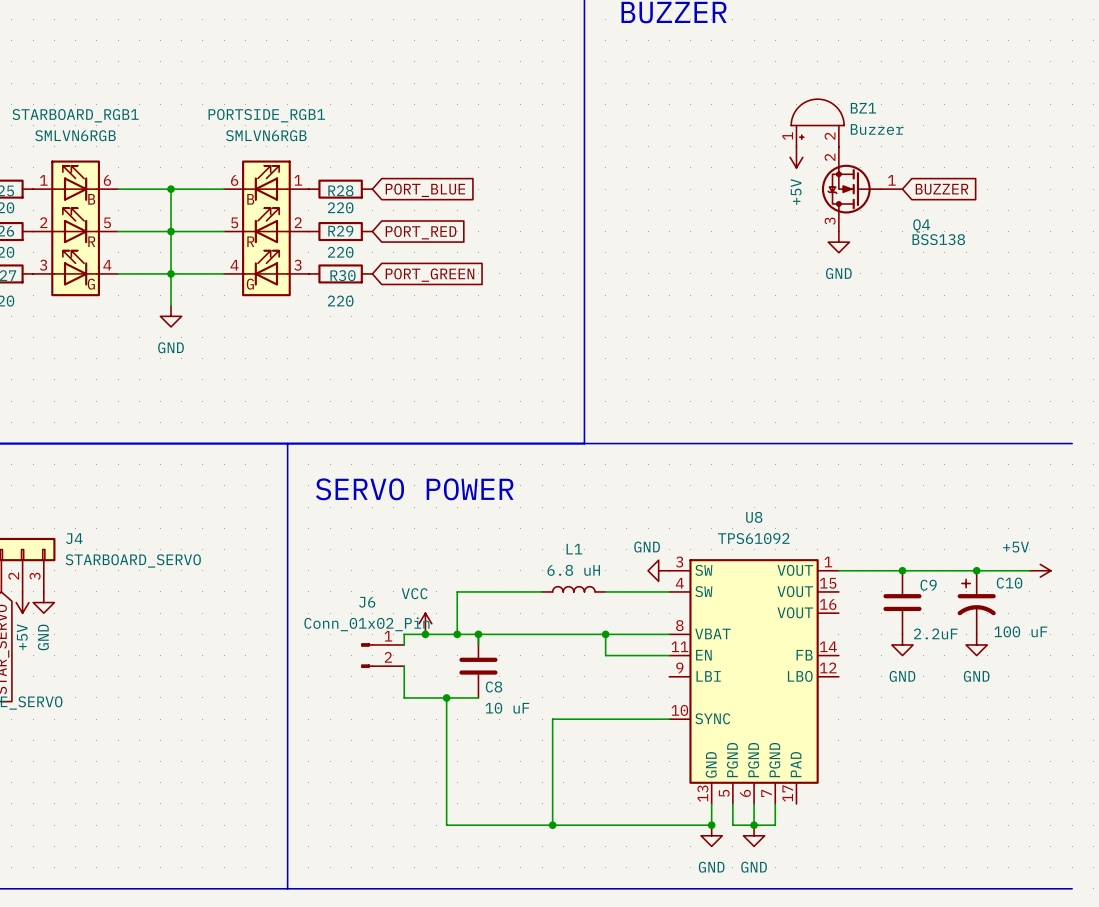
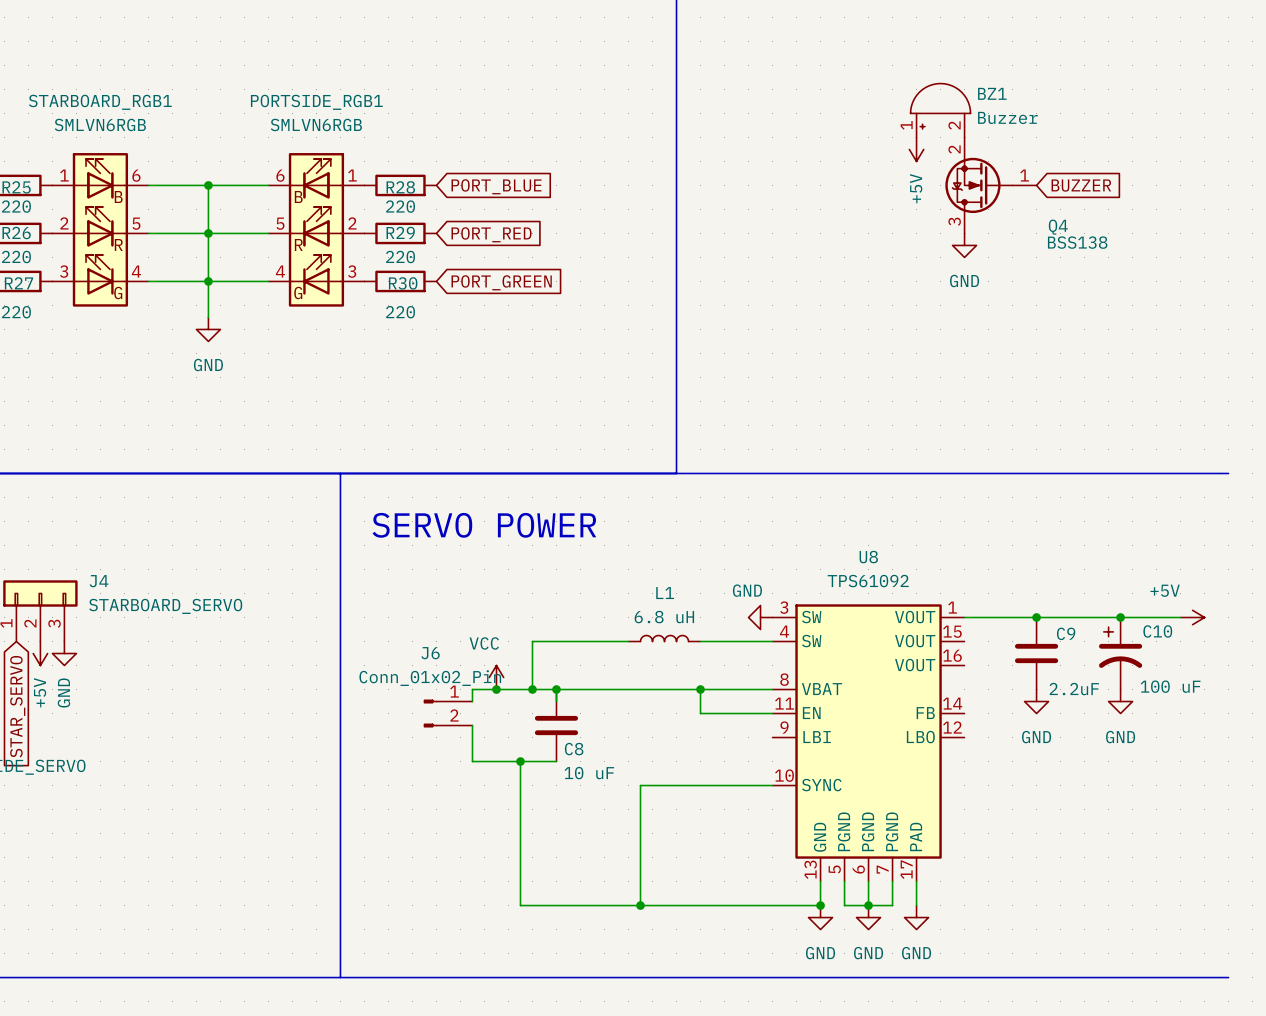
wire: none -> (916, 881) (916, 905)
power symbol: none -> GND (916, 917)

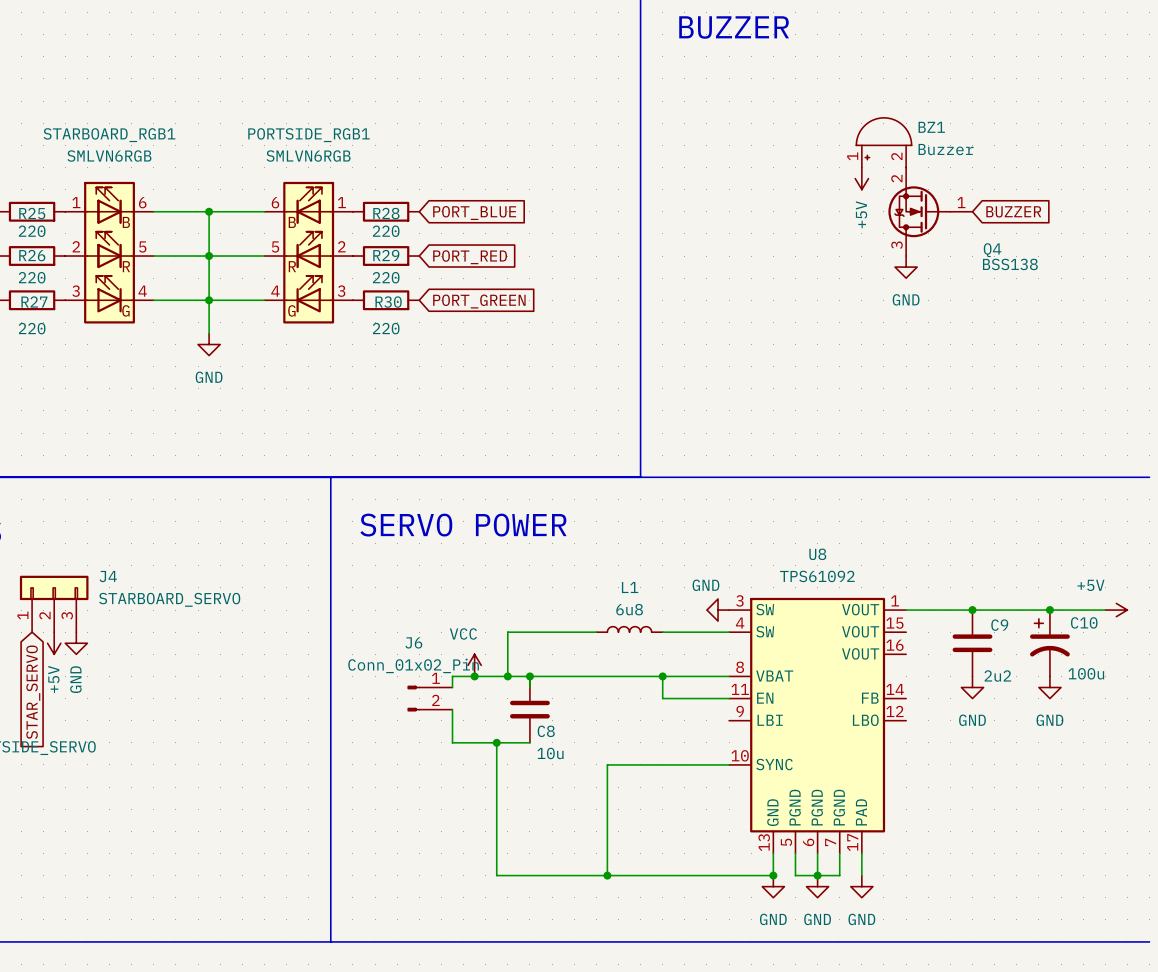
L1 value: 6.8 uH (664, 617) -> 6u8 (629, 609)
C10 value: 100 uF (1170, 686) -> 100u (1086, 673)
C9 value: 2.2uF (1074, 689) -> 2u2 (997, 676)
C8 value: 10 uF (589, 773) -> 10u (550, 753)

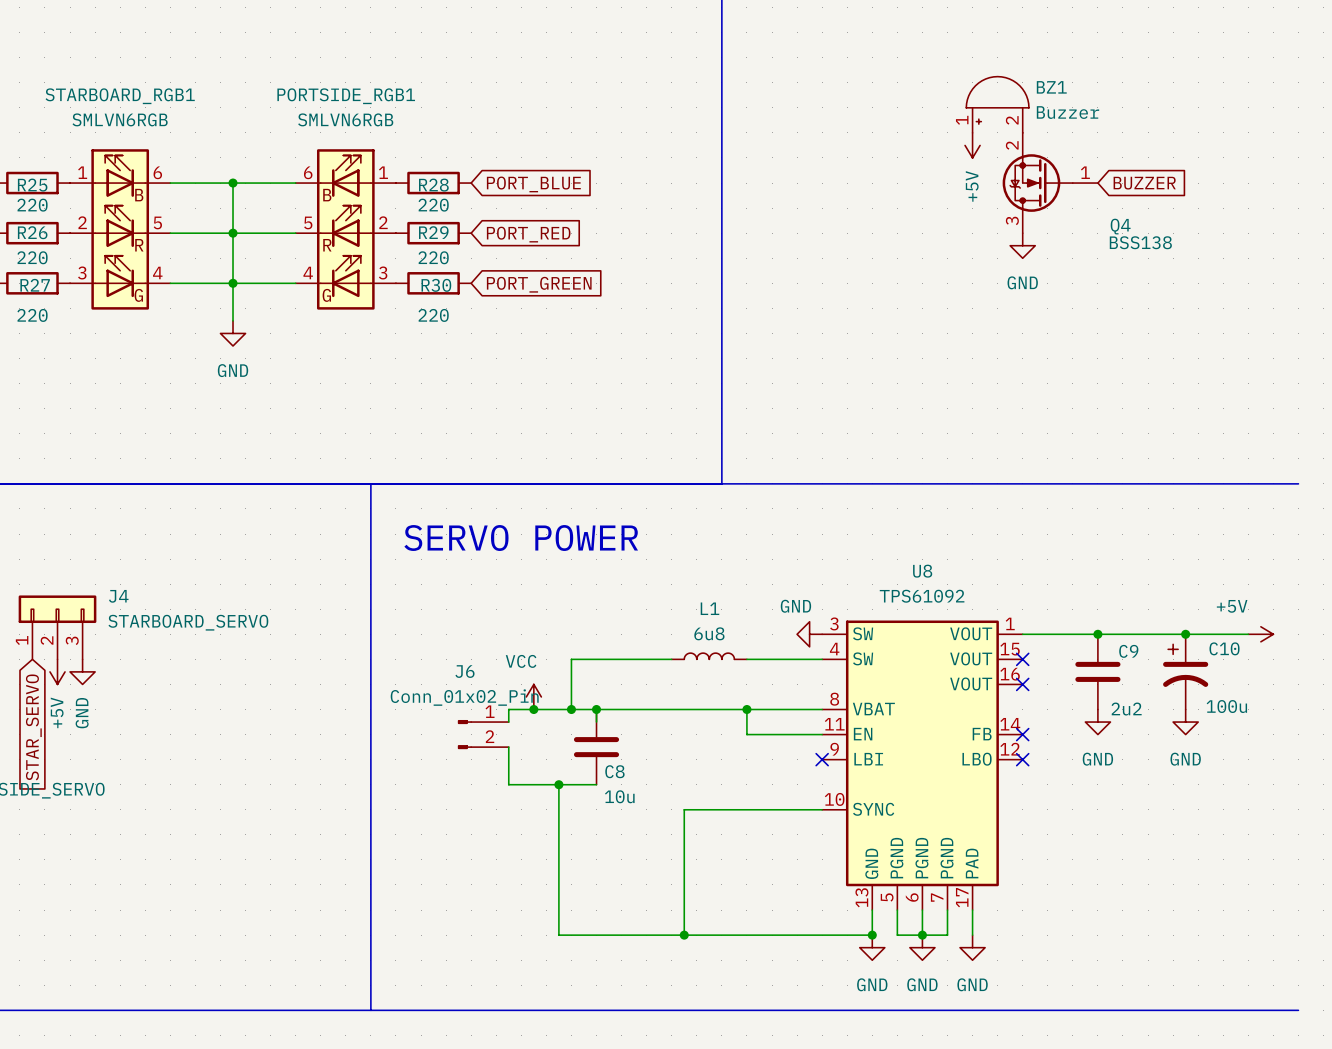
no-connect mark: none -> (1022, 659)
no-connect mark: none -> (1022, 684)
no-connect mark: none -> (1022, 734)
no-connect mark: none -> (822, 759)
no-connect mark: none -> (1022, 759)

